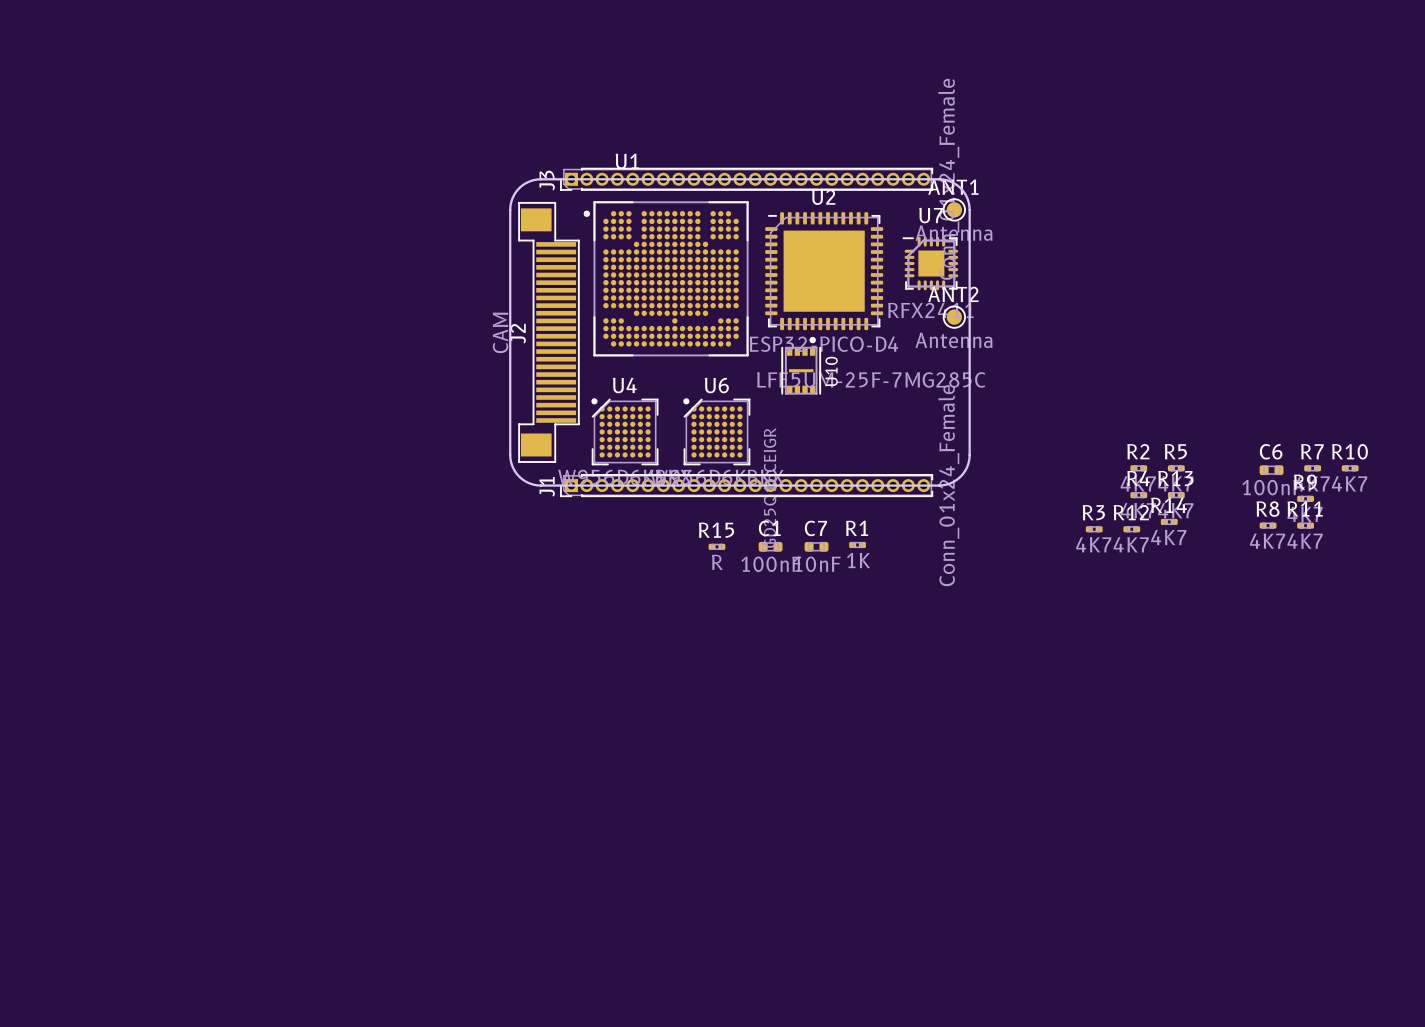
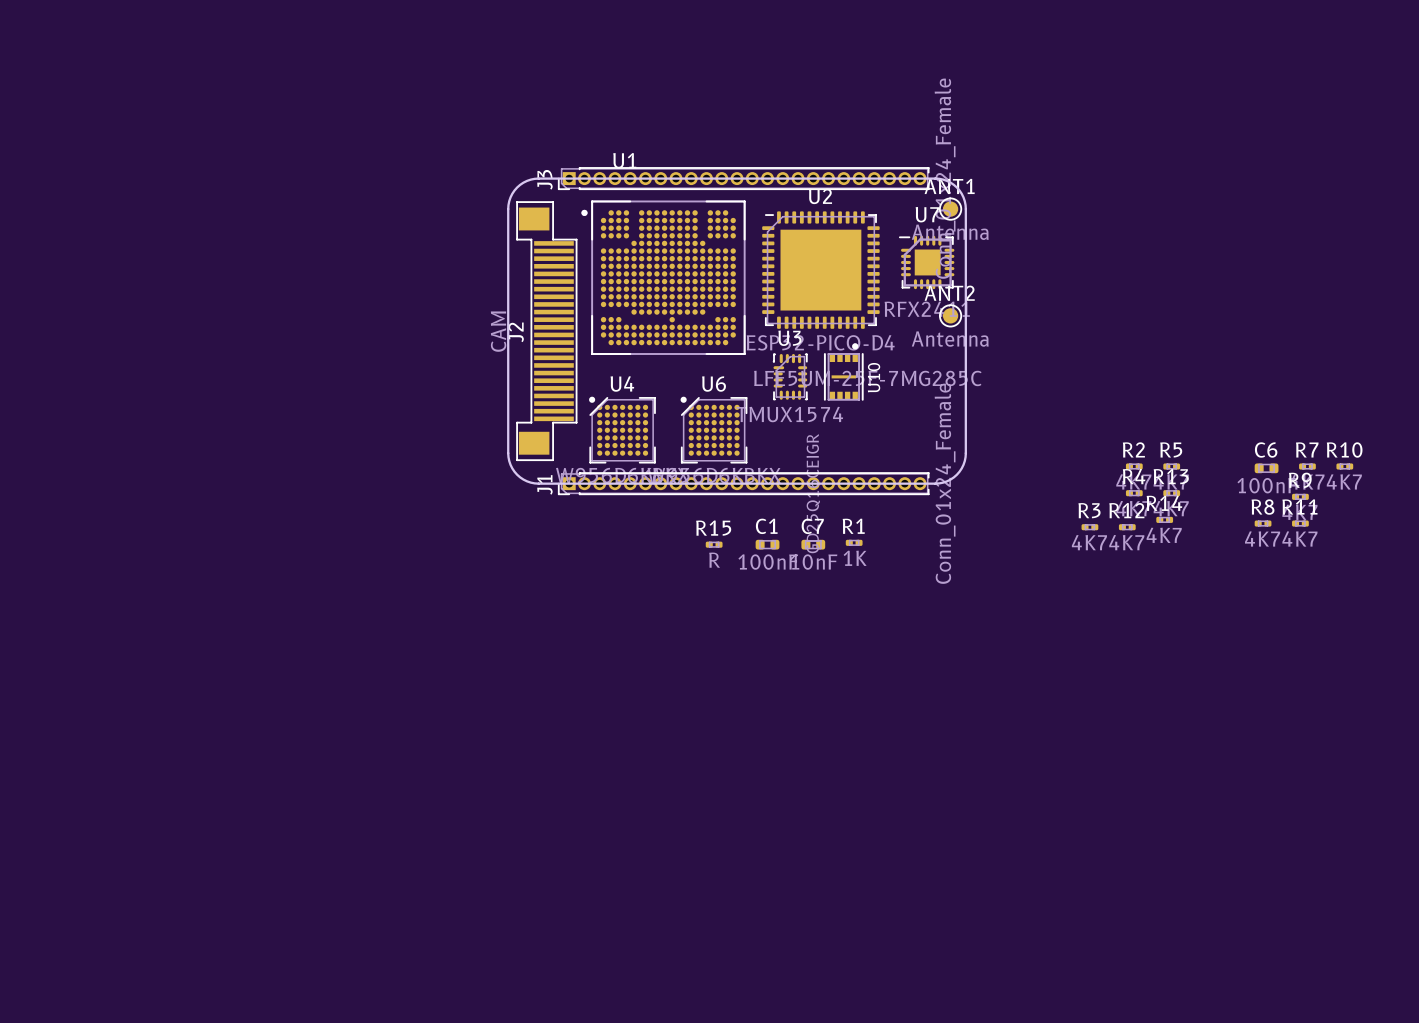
U10 position: (801, 365) -> (843, 372)
U3: none -> TMUX1574 (790, 376)

